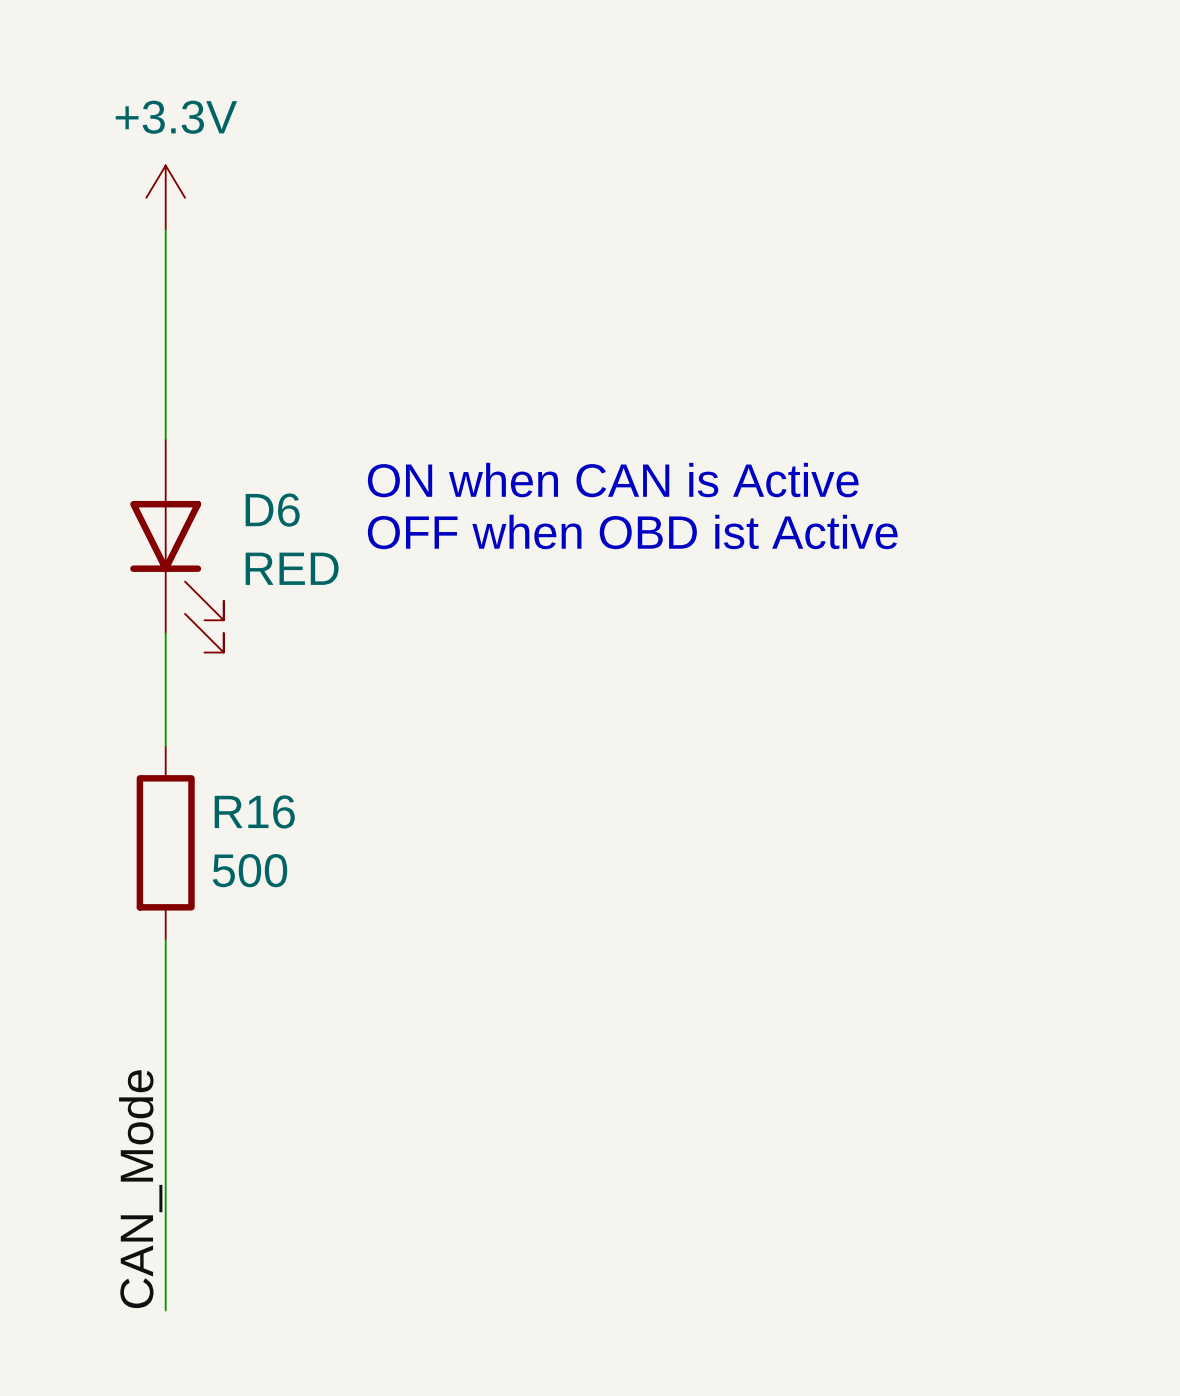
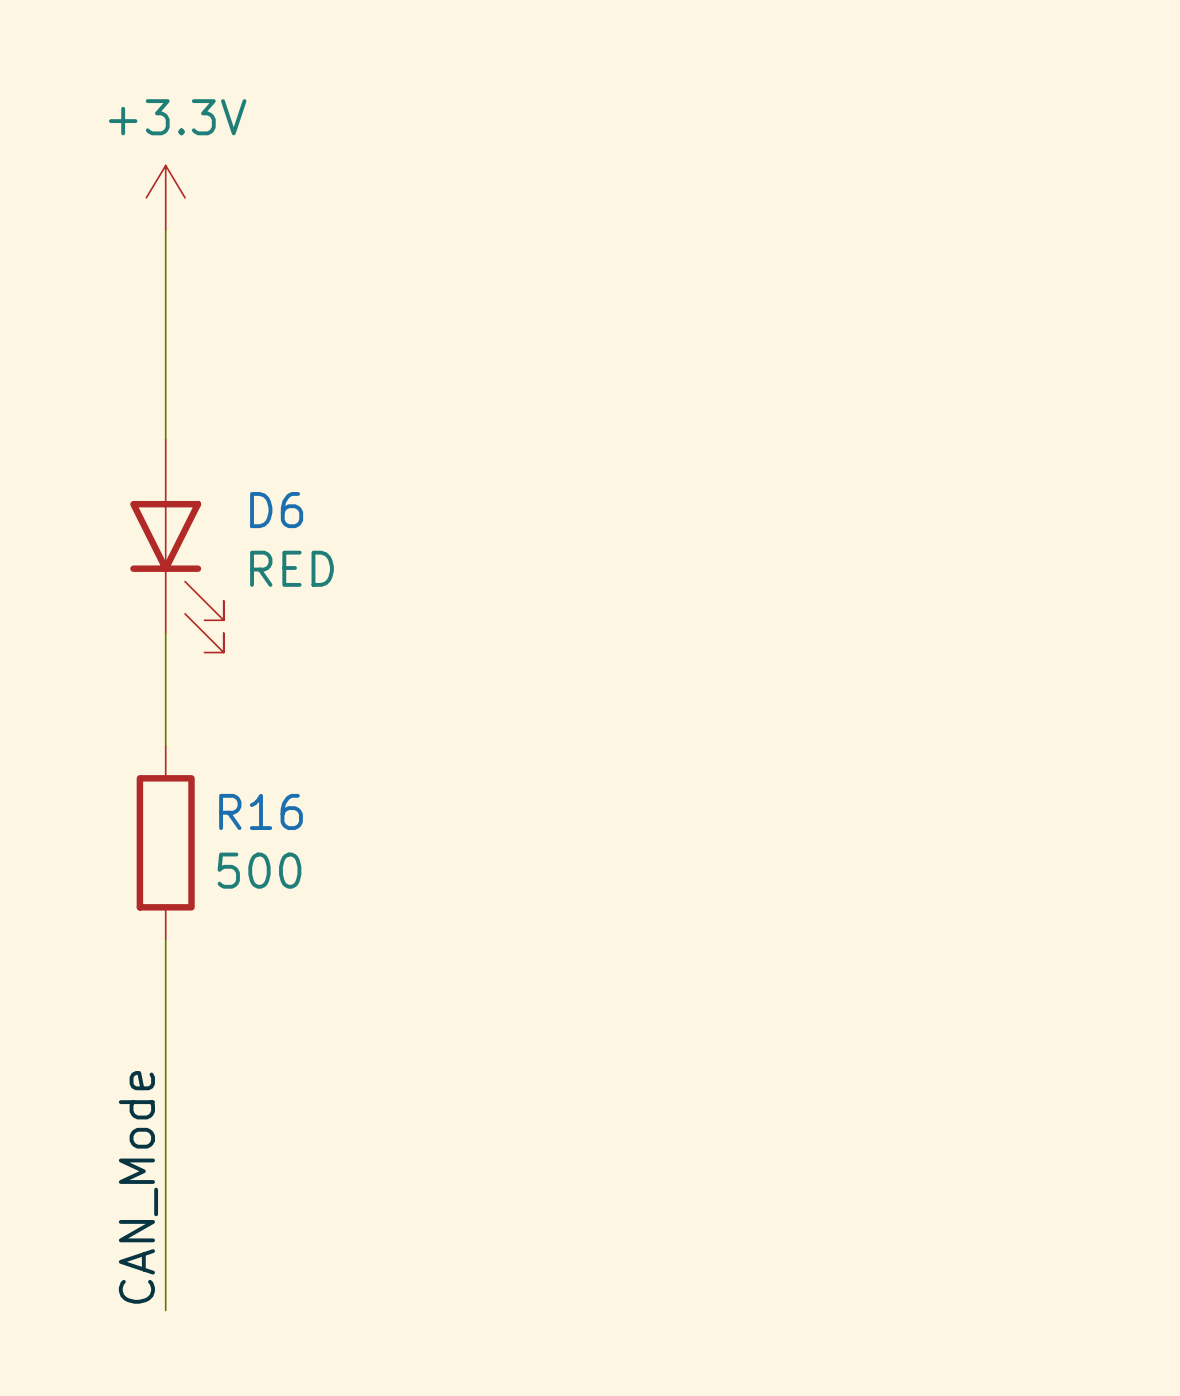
text: ON when CAN is Active (613, 480) -> none
text: OFF when OBD ist Active (632, 531) -> none

